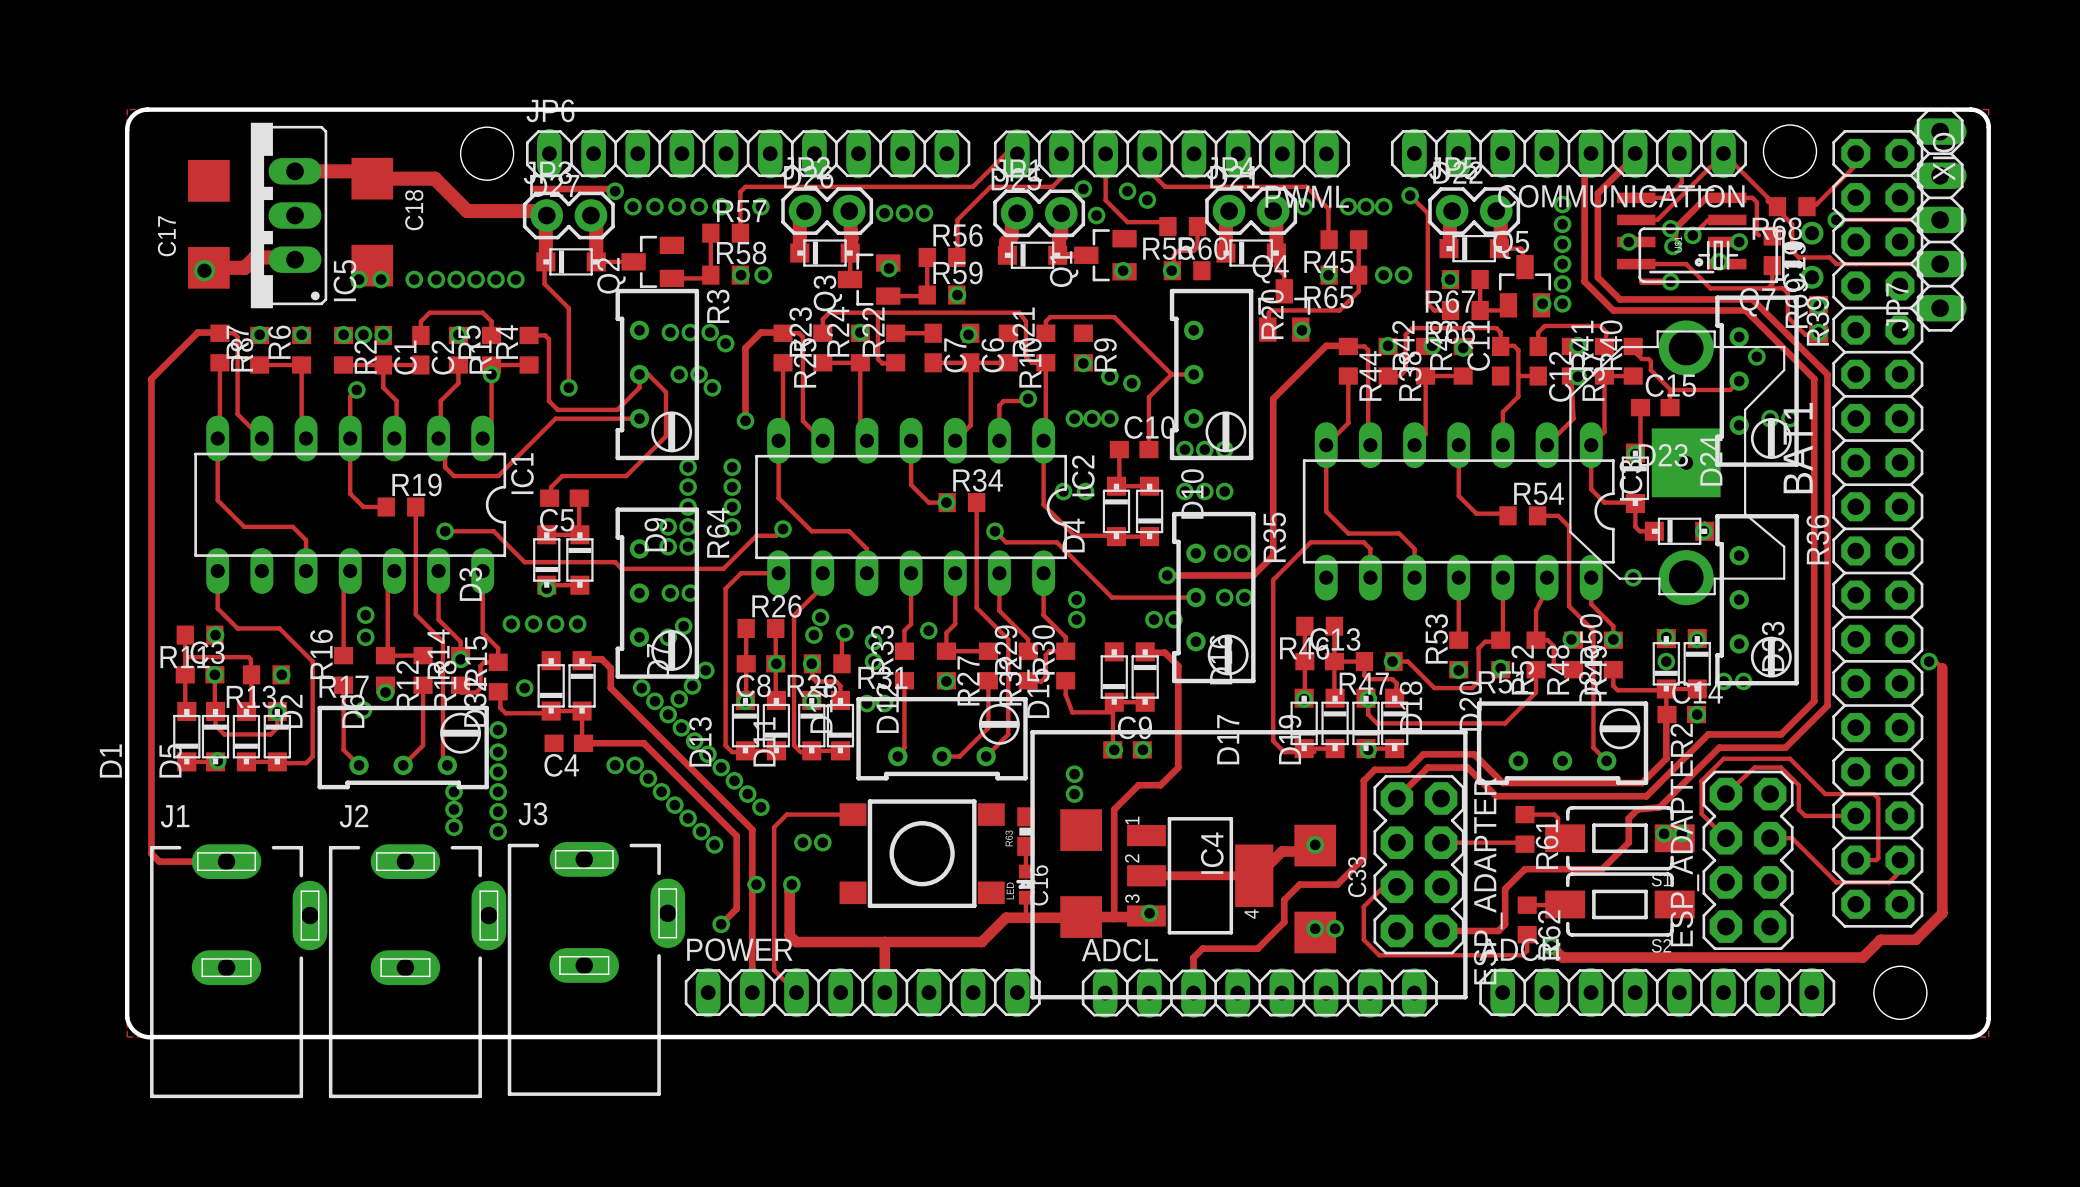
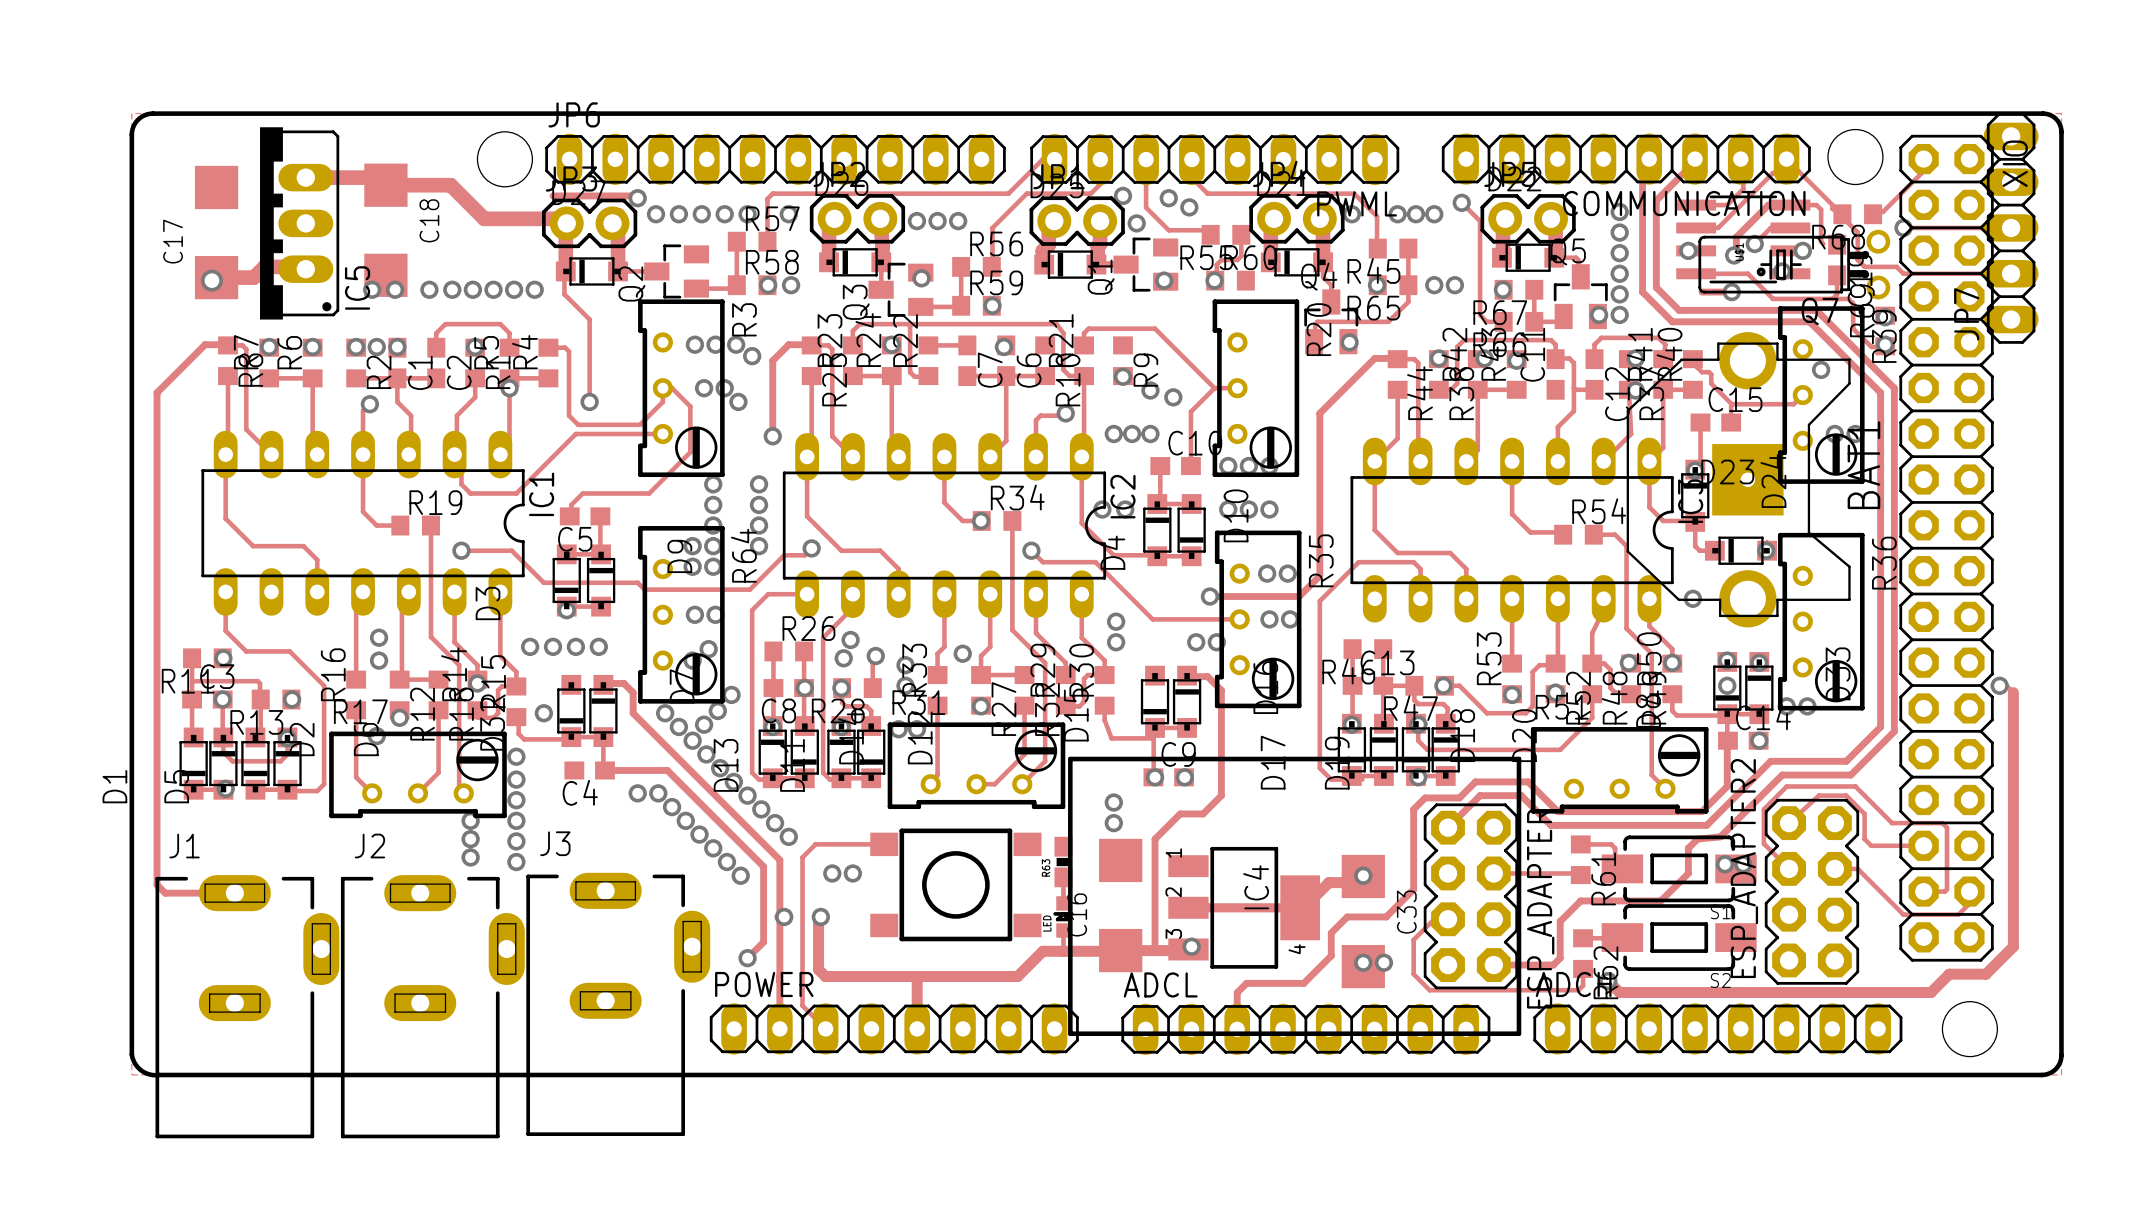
via: (1670, 228) -> none

